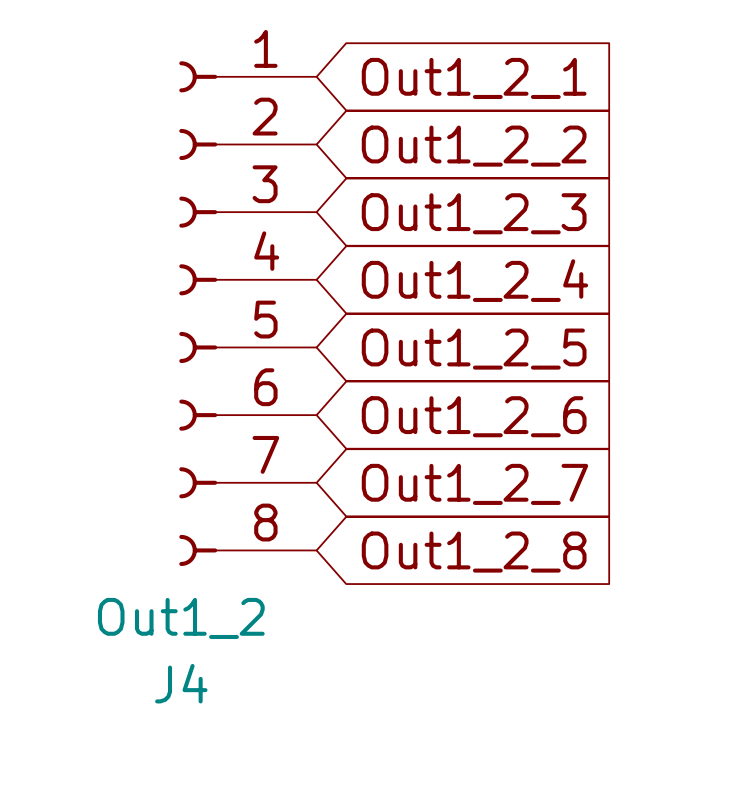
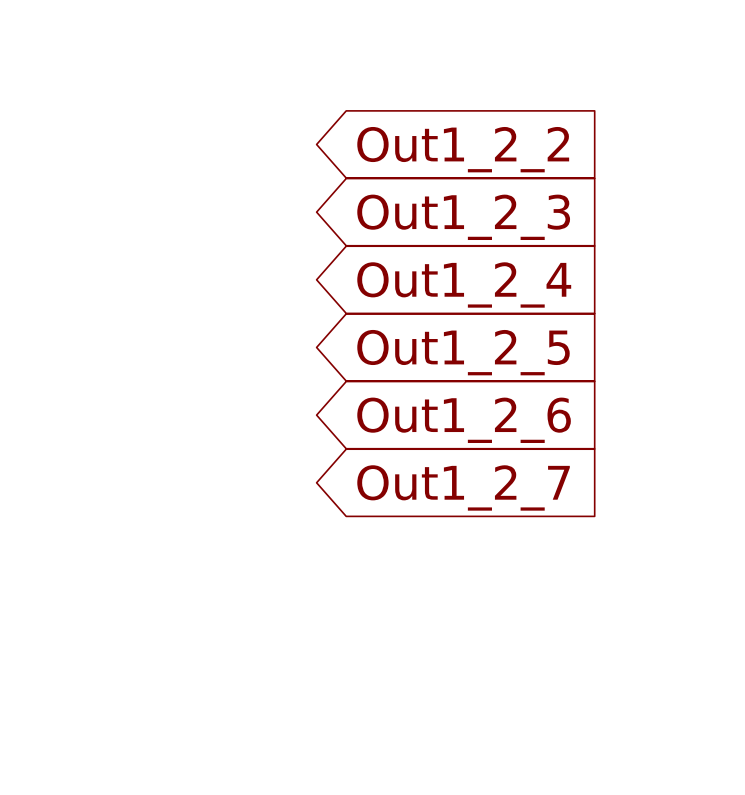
global label: Out1_2_1 (474, 78) -> none
J4: Out1_2 (247, 313) -> none
global label: Out1_2_8 (474, 552) -> none

